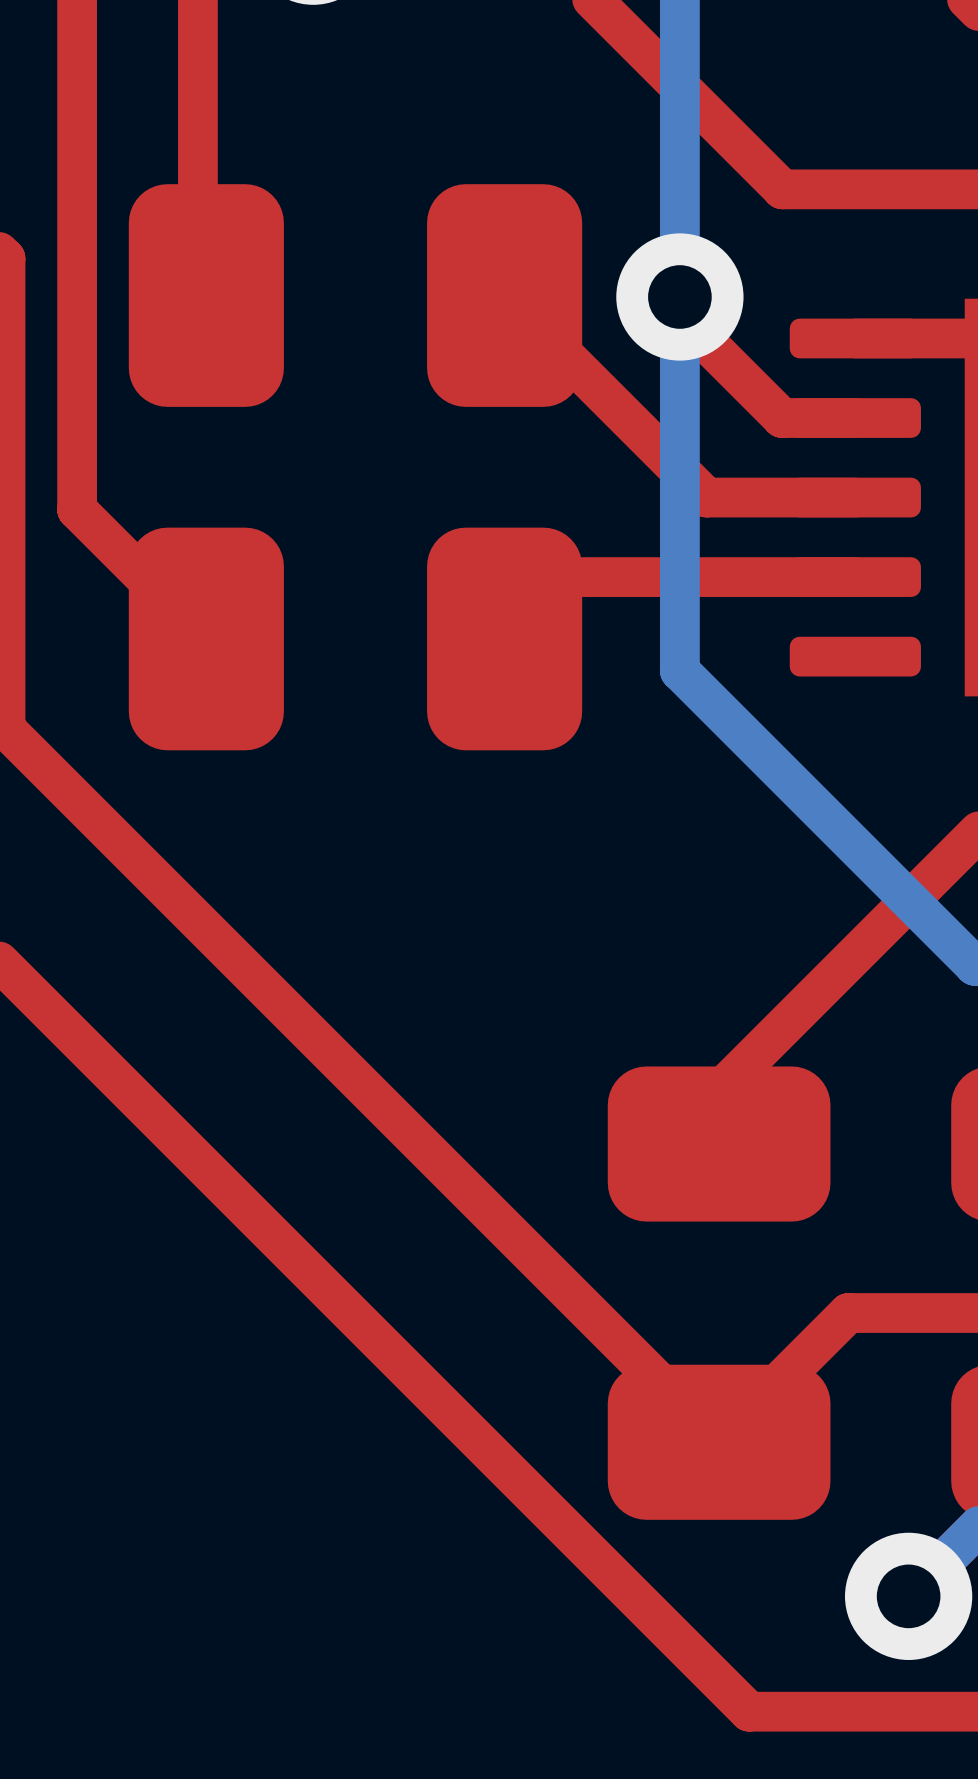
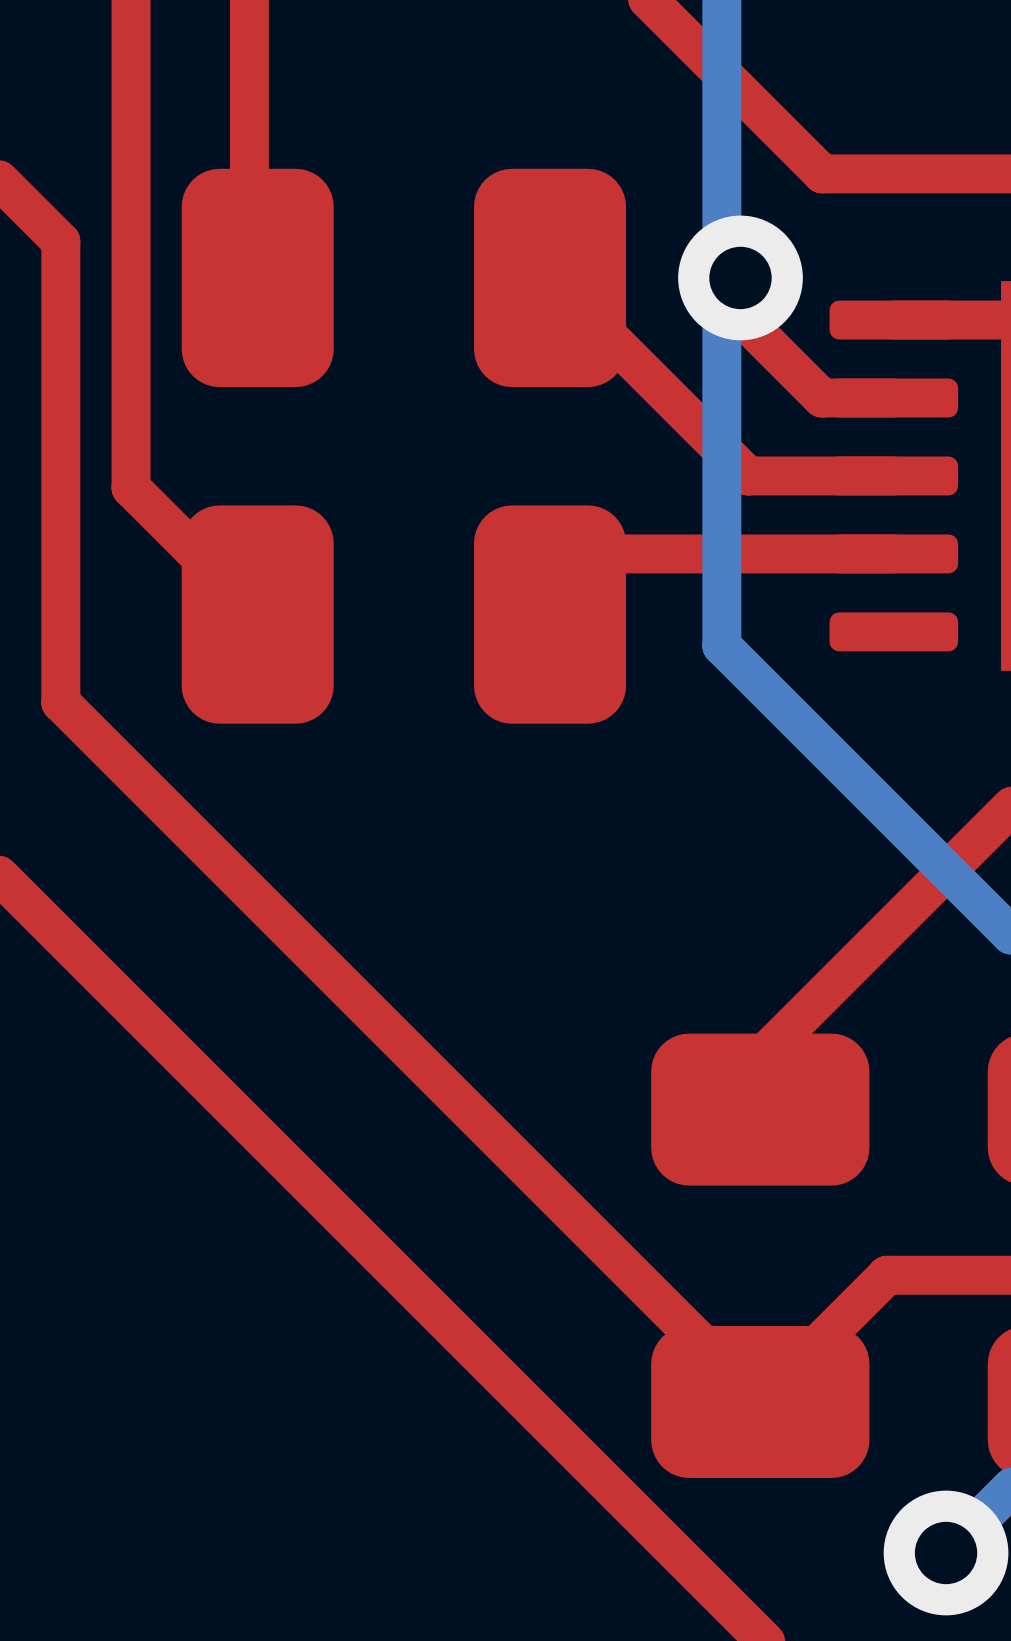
via position: (679, 296) -> (740, 277)

